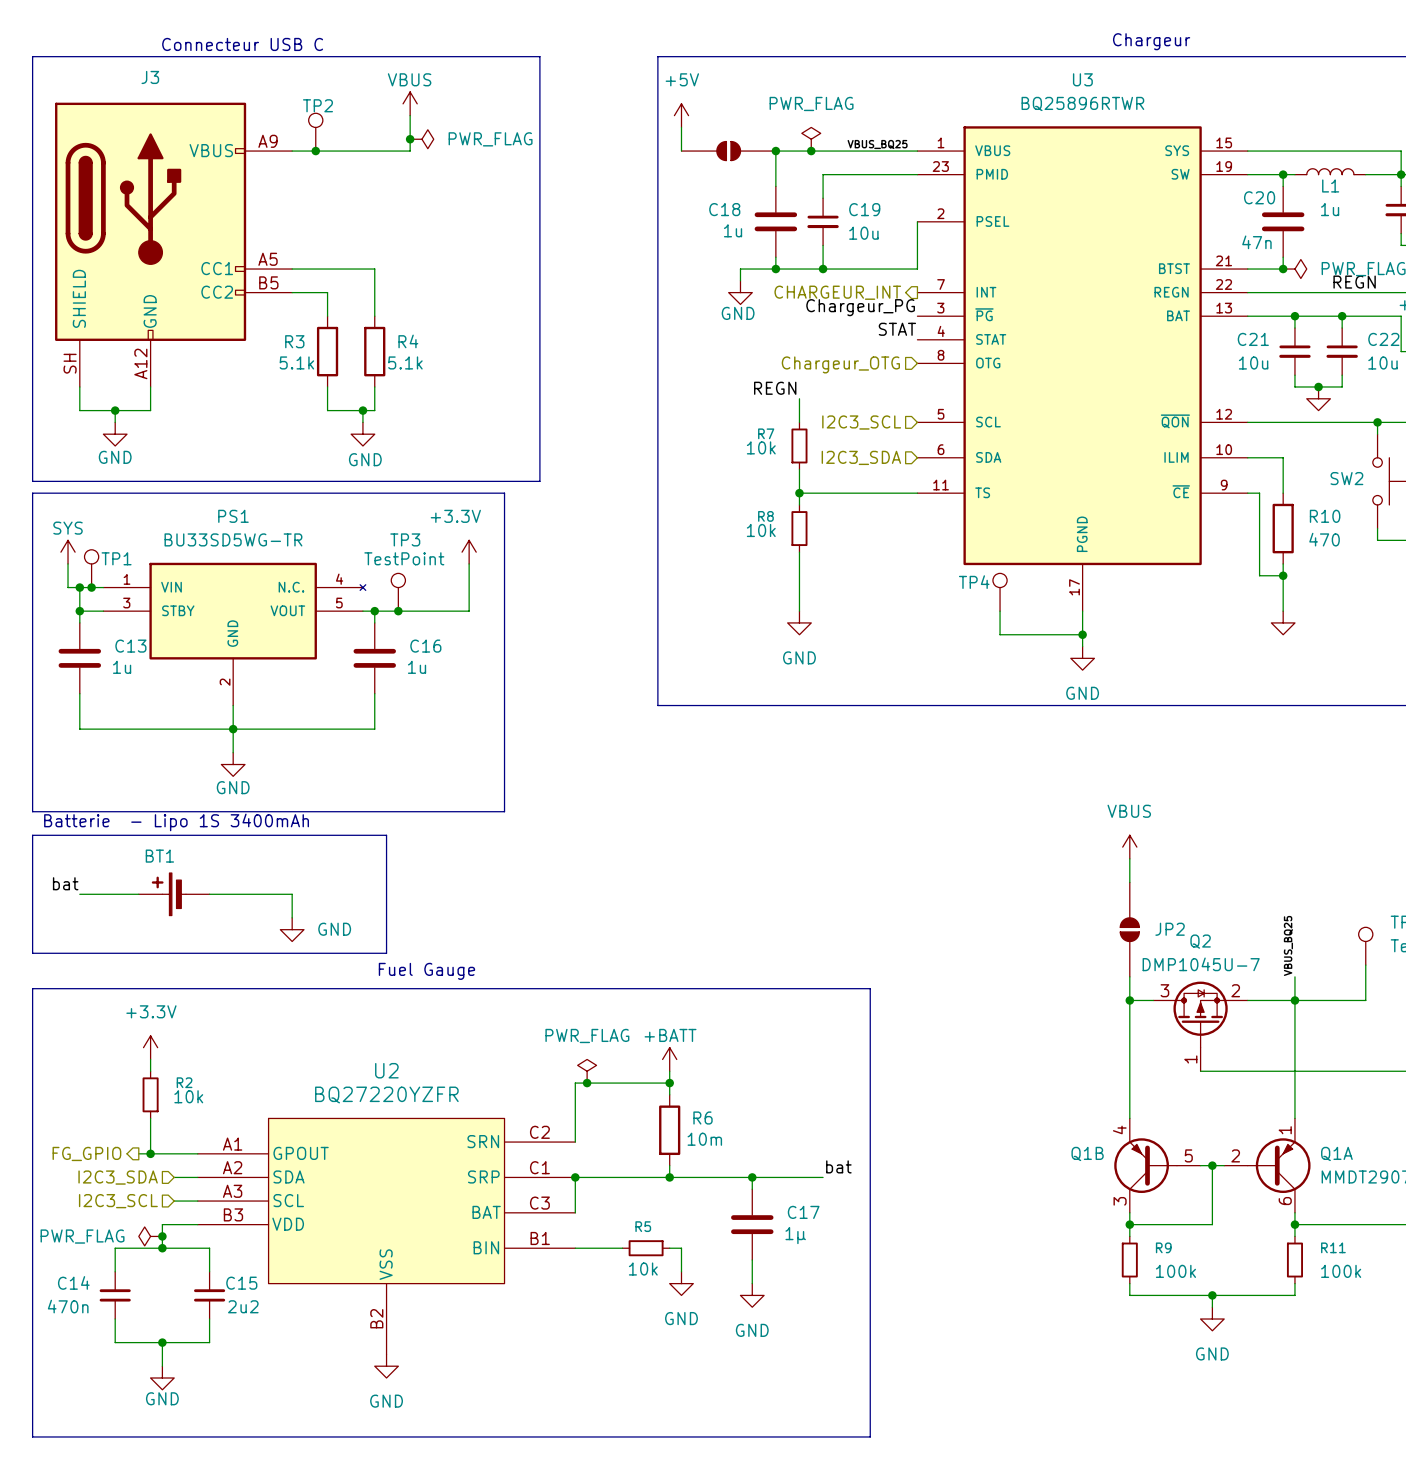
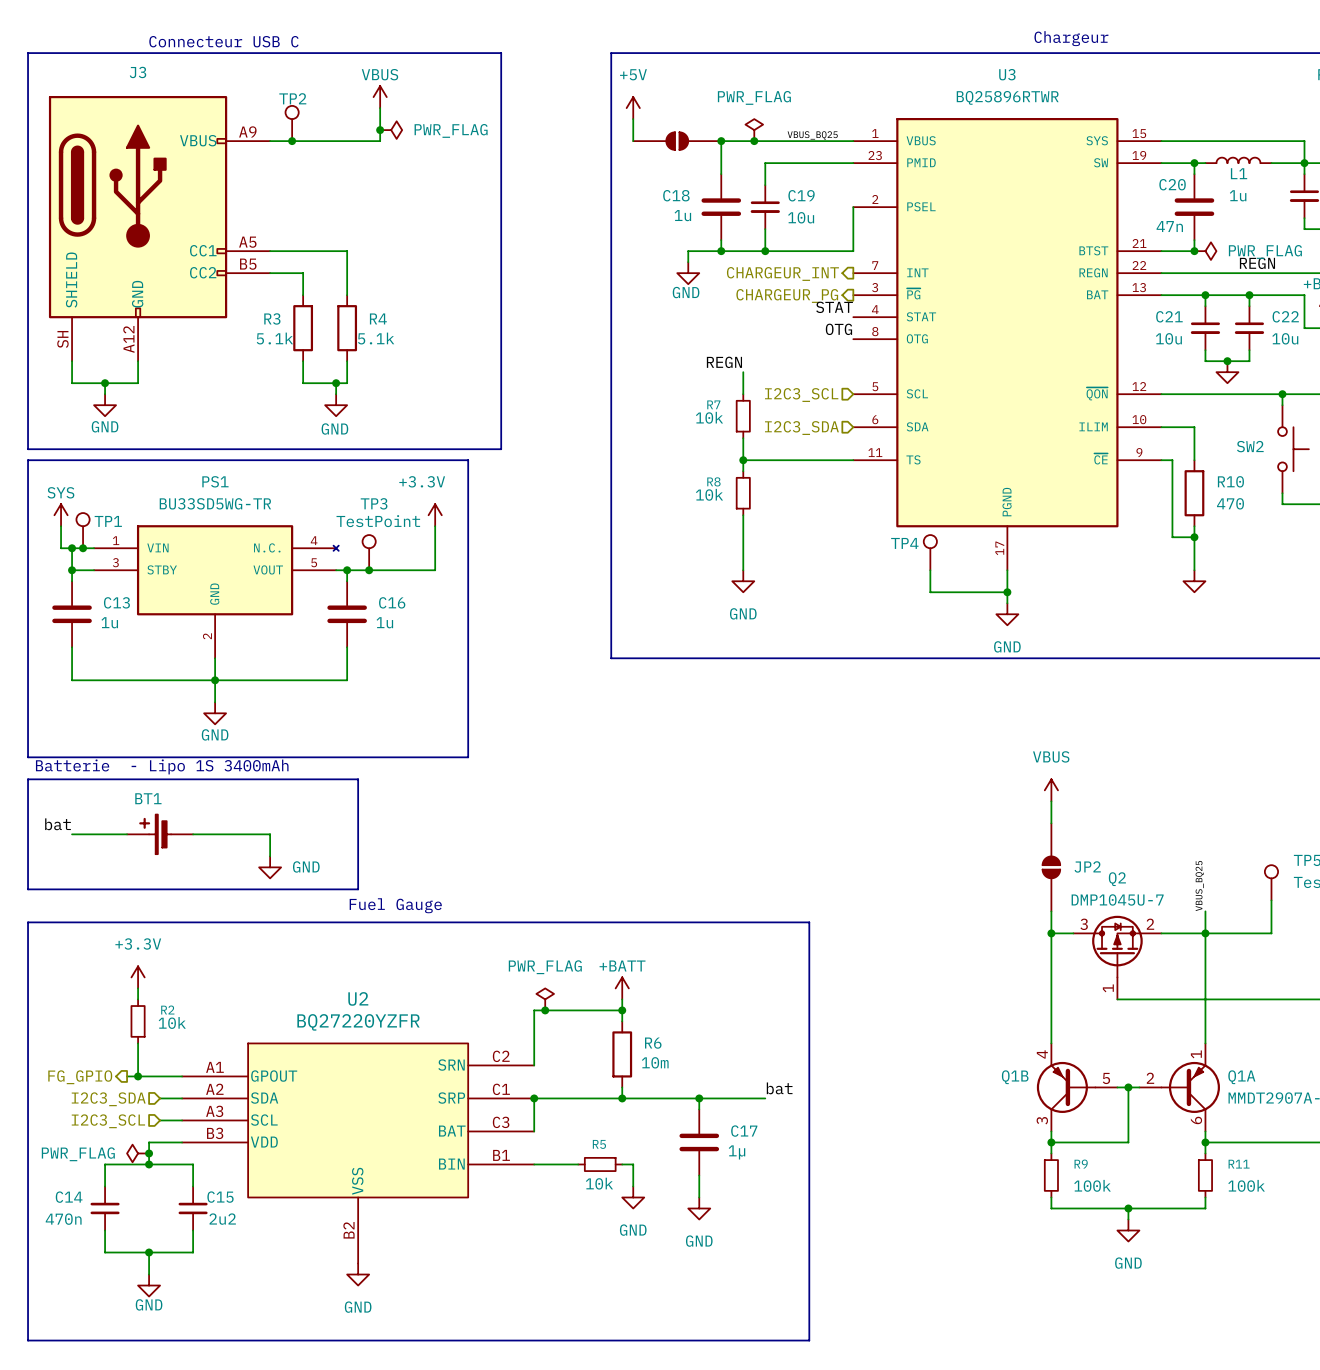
label: Chargeur_PG (860, 307) -> none
hierarchical label: none -> CHARGEUR_PG (787, 295)
label: none -> OTG (838, 329)
hierarchical label: Chargeur_OTG (840, 364) -> none

